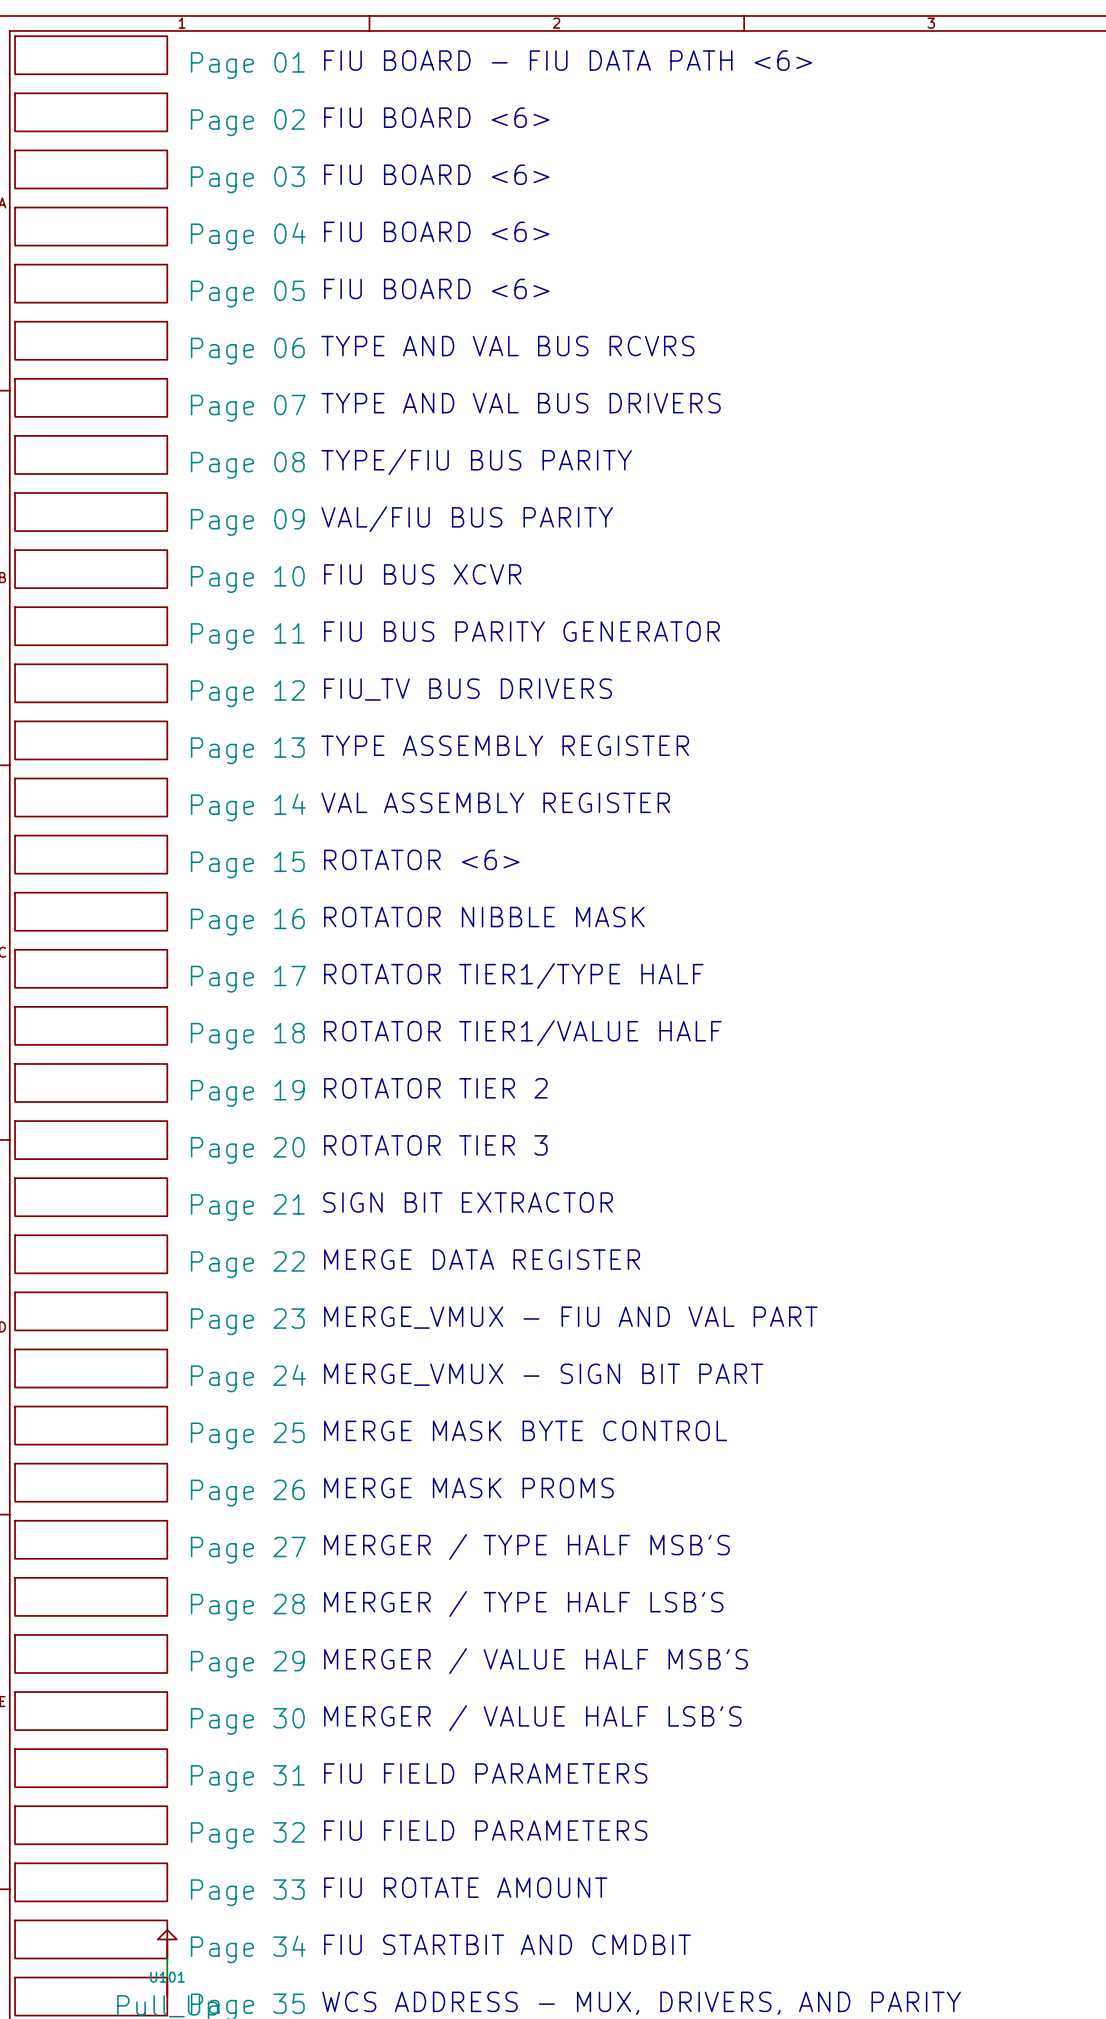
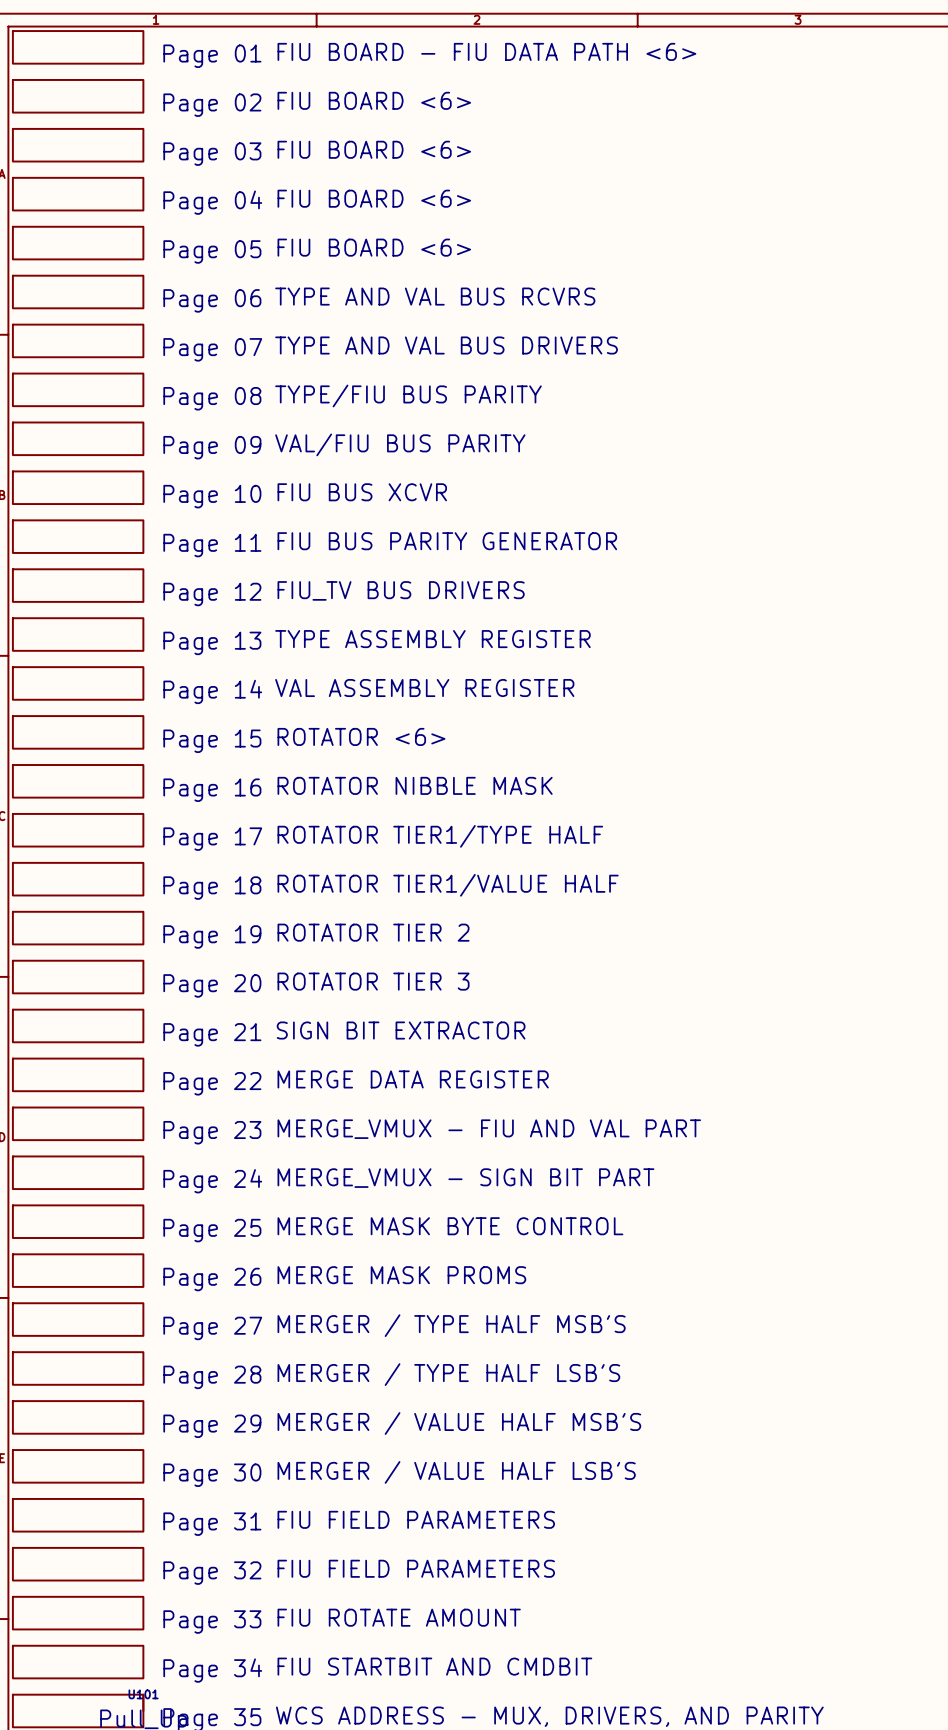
power symbol: (167, 1943) -> none
wire: (167, 1958) (167, 1977) -> none

